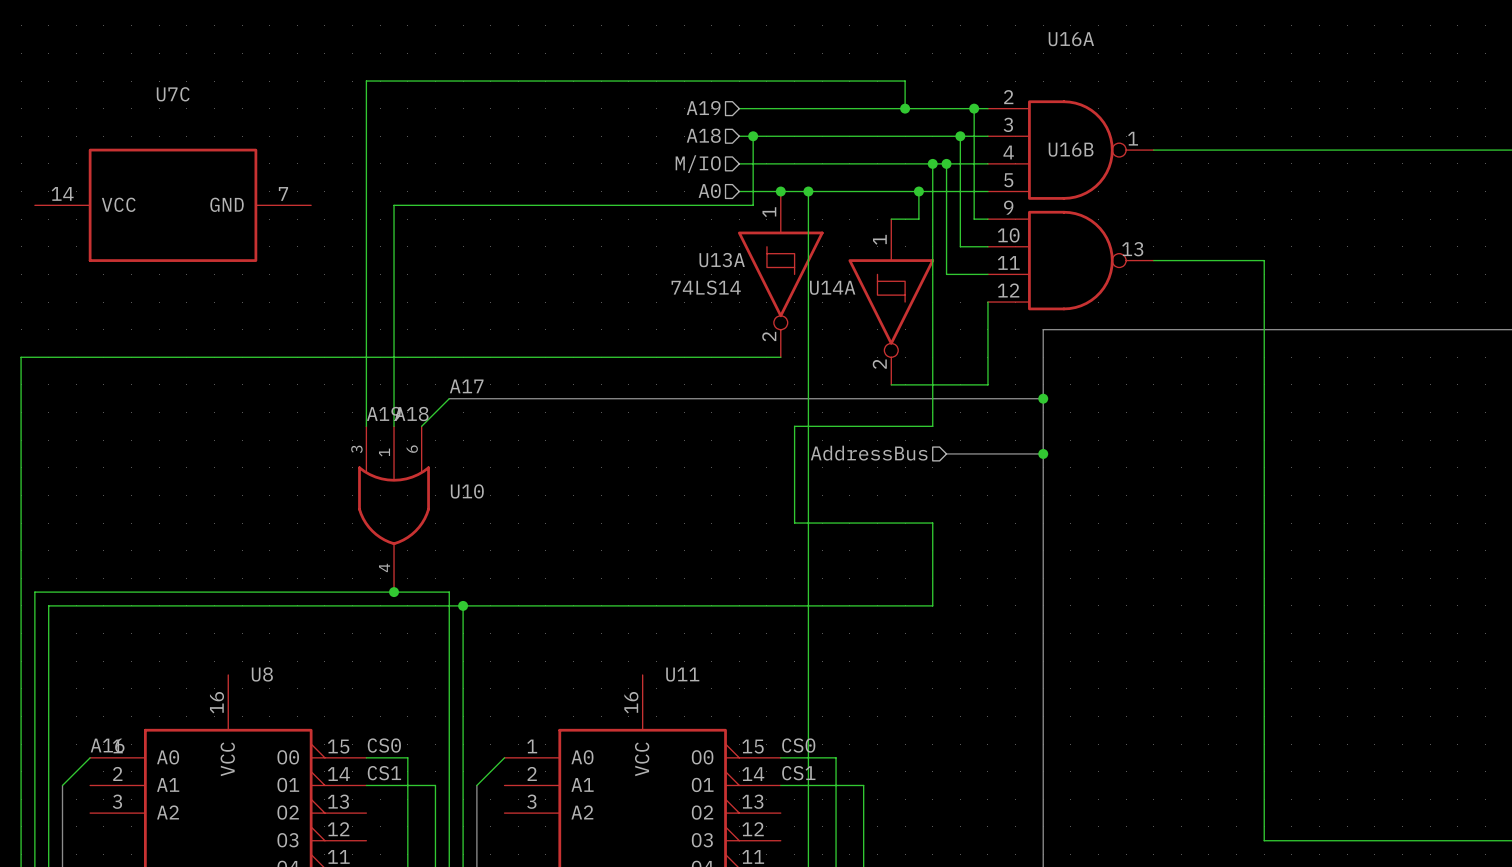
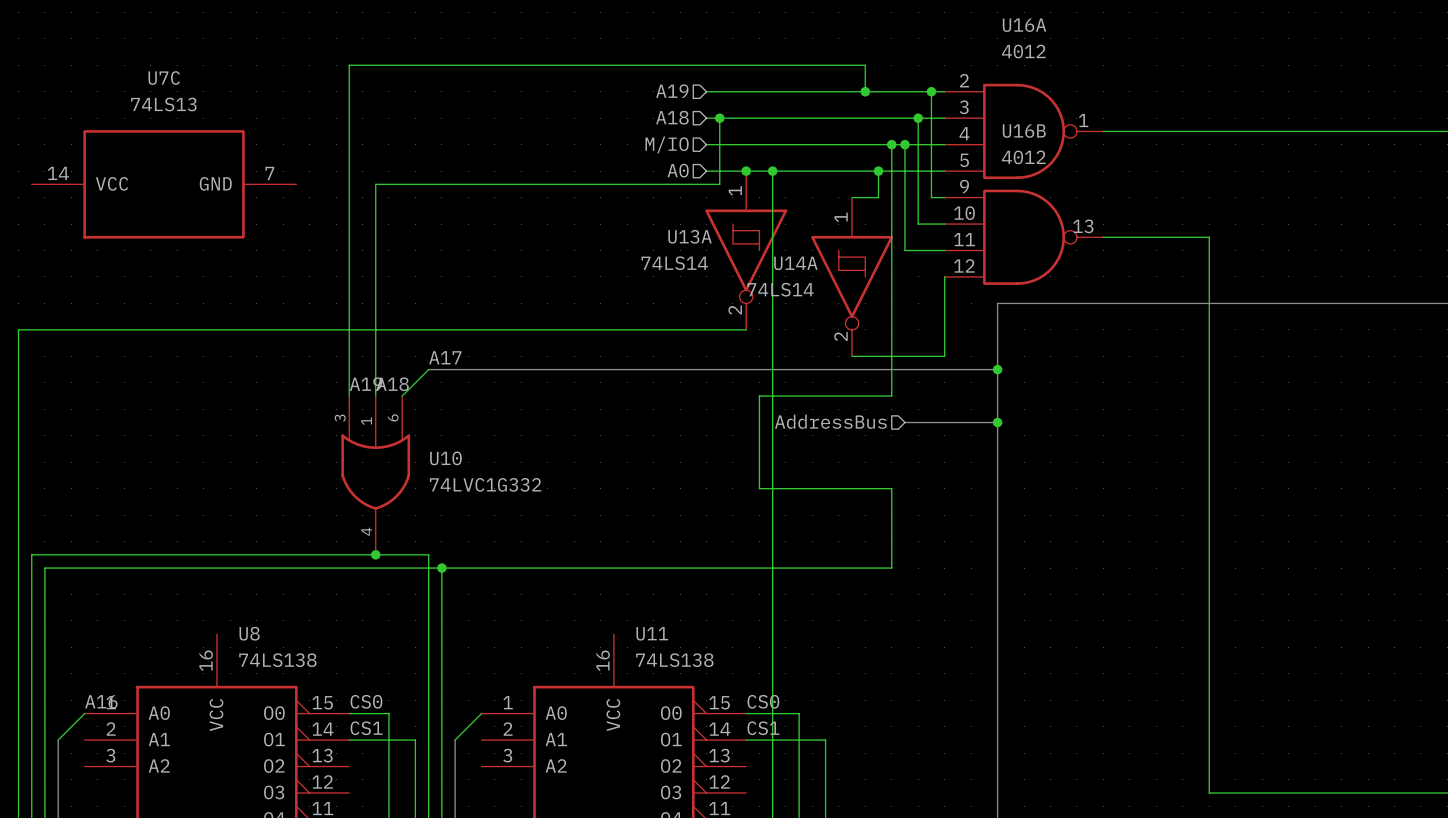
U16A value: none -> 4012 (1023, 51)
U7C value: none -> 74LS13 (163, 104)
U16B value: none -> 4012 (1023, 157)
U14A value: none -> 74LS14 (780, 289)
U10 value: none -> 74LVC1G332 (485, 484)
U8 value: none -> 74LS138 (277, 660)
U11 value: none -> 74LS138 (674, 660)

